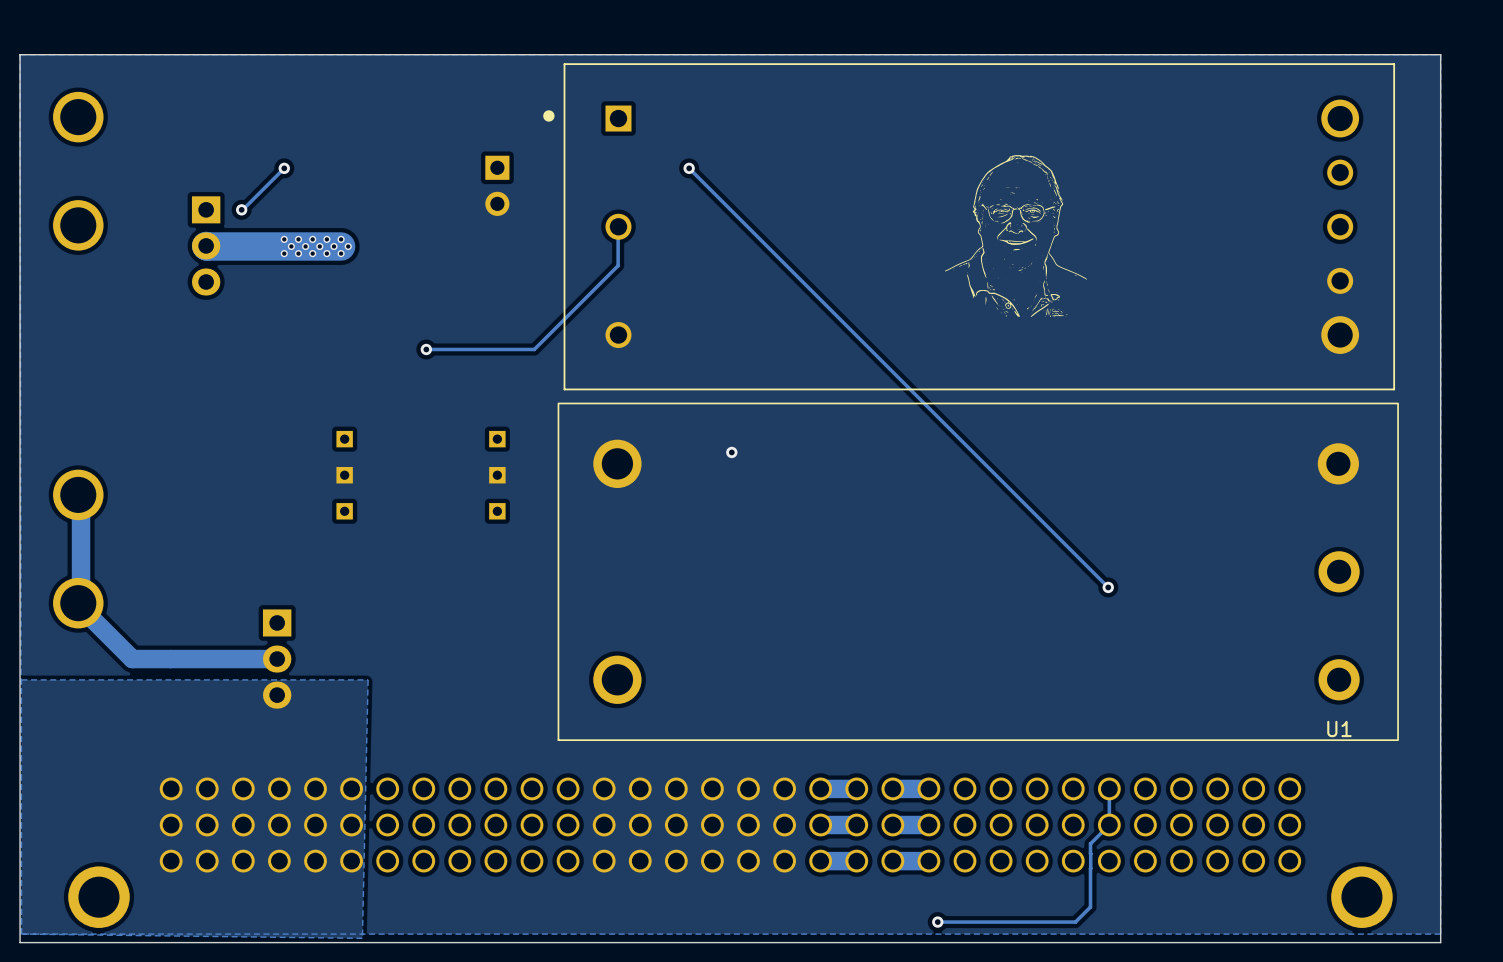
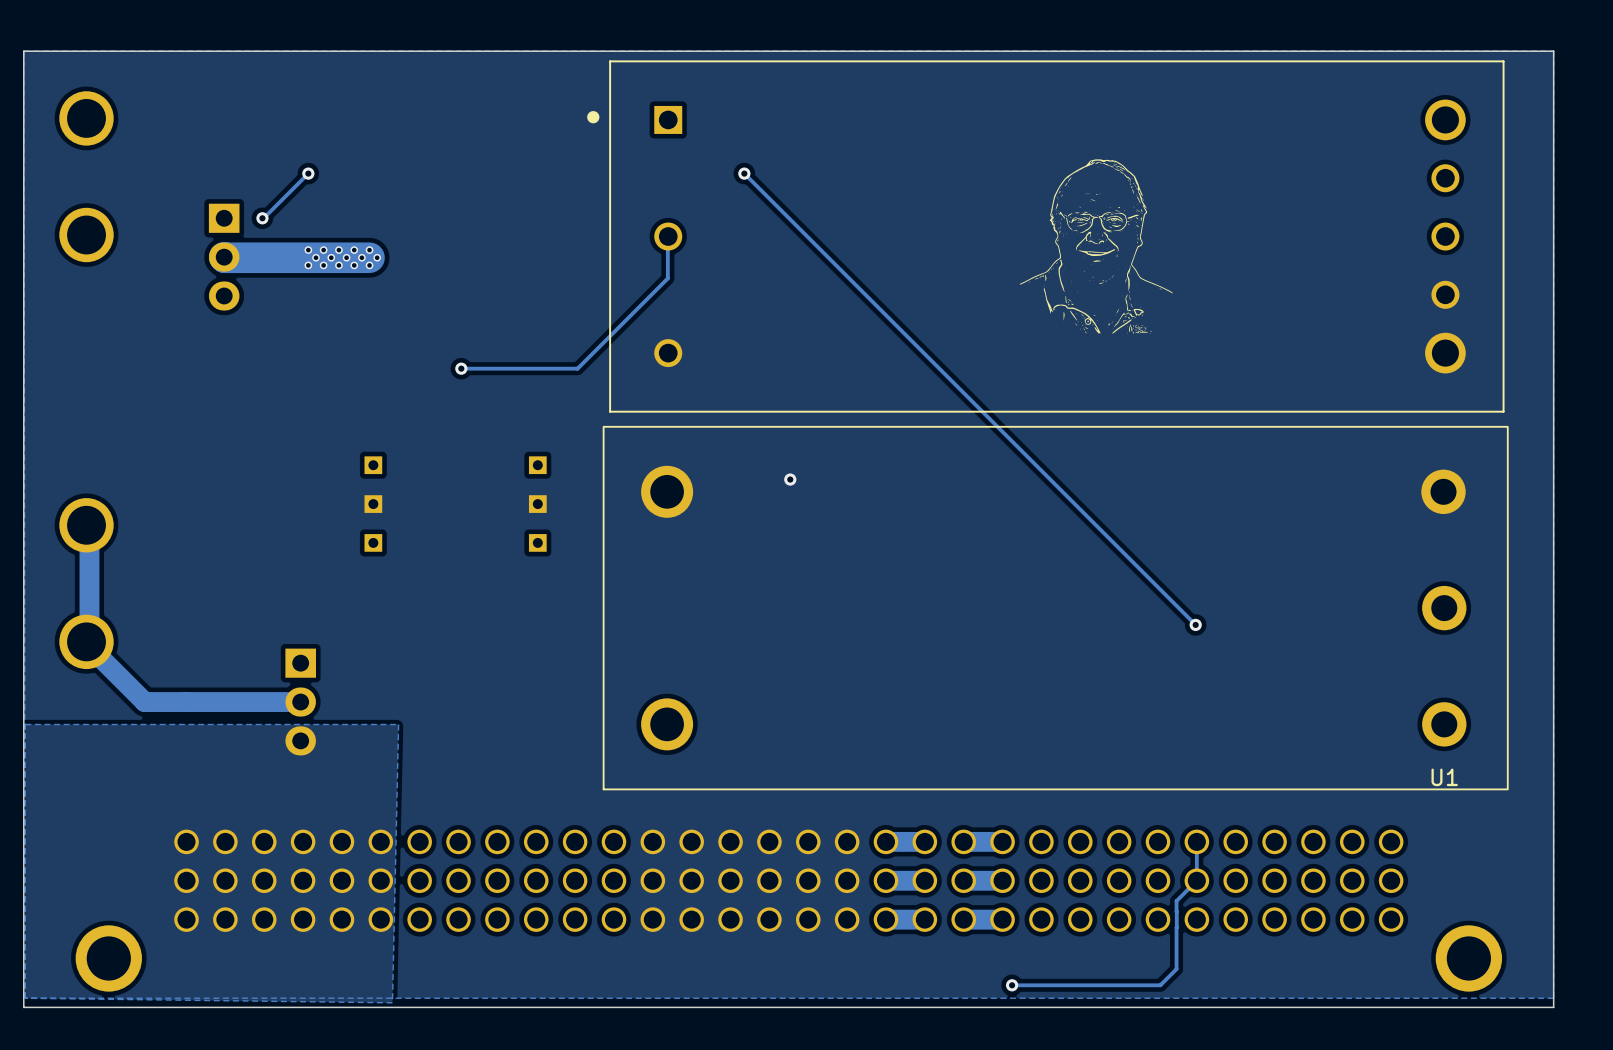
part: (497, 185) -> none

